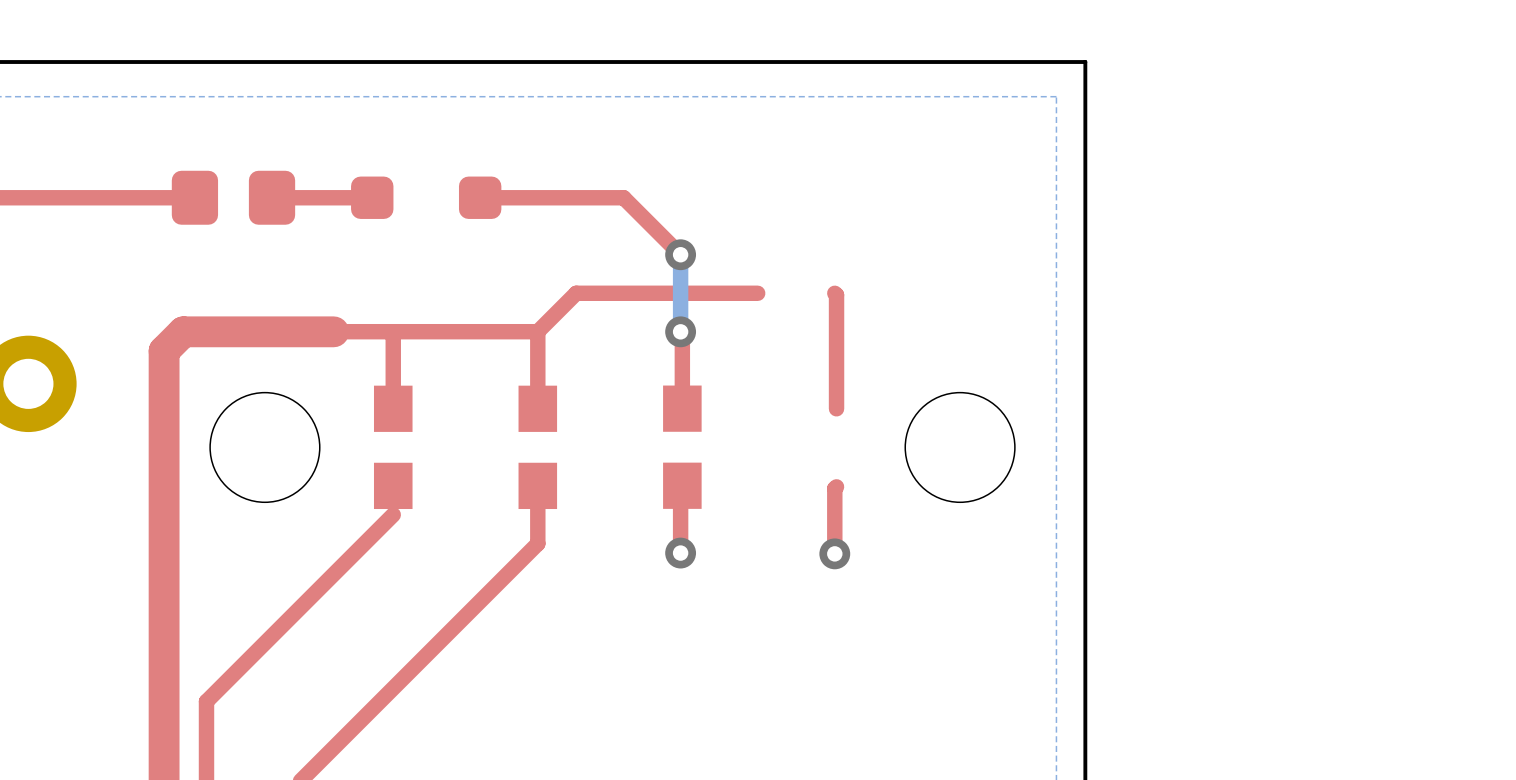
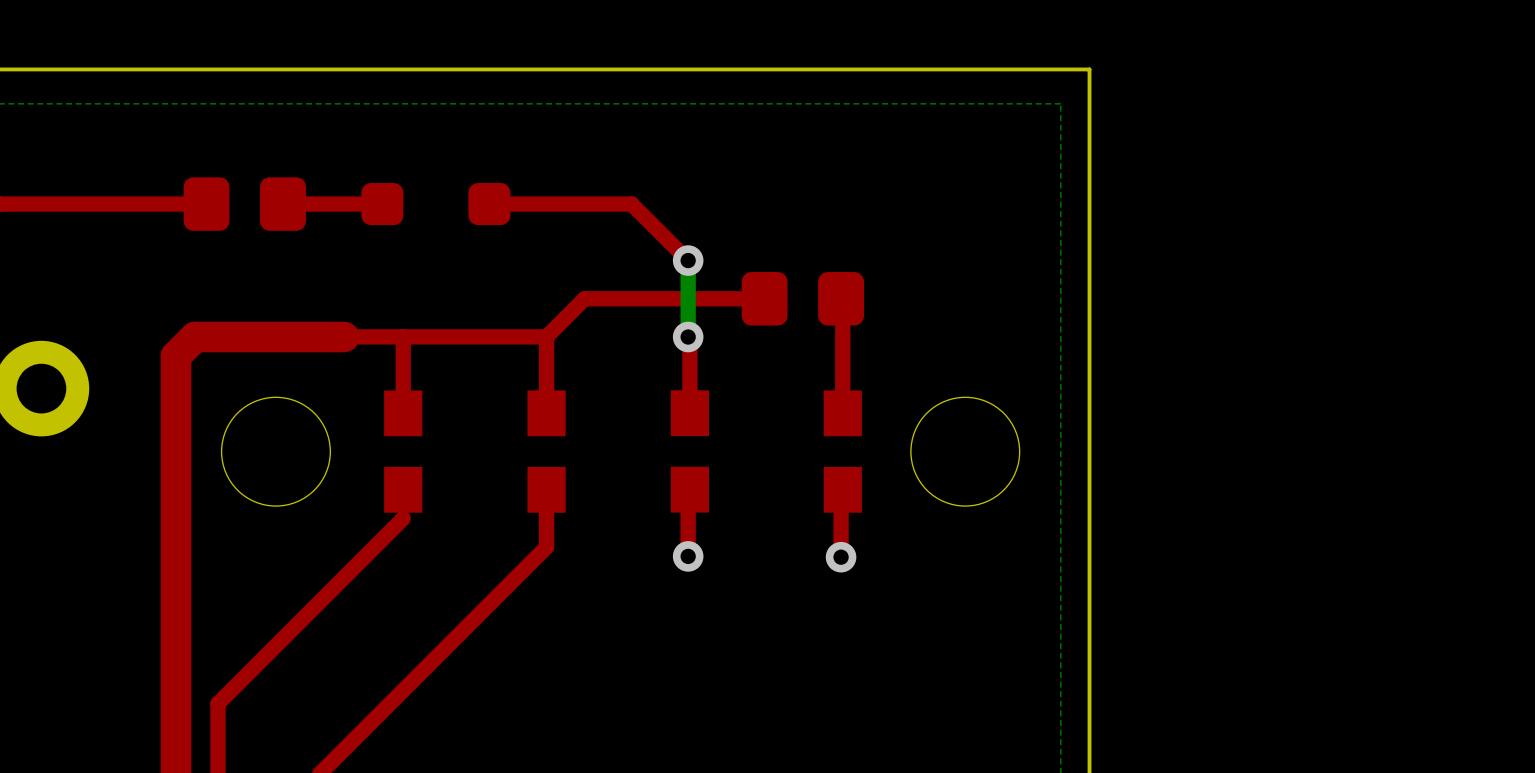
part: none -> (802, 298)
part: none -> (842, 451)

